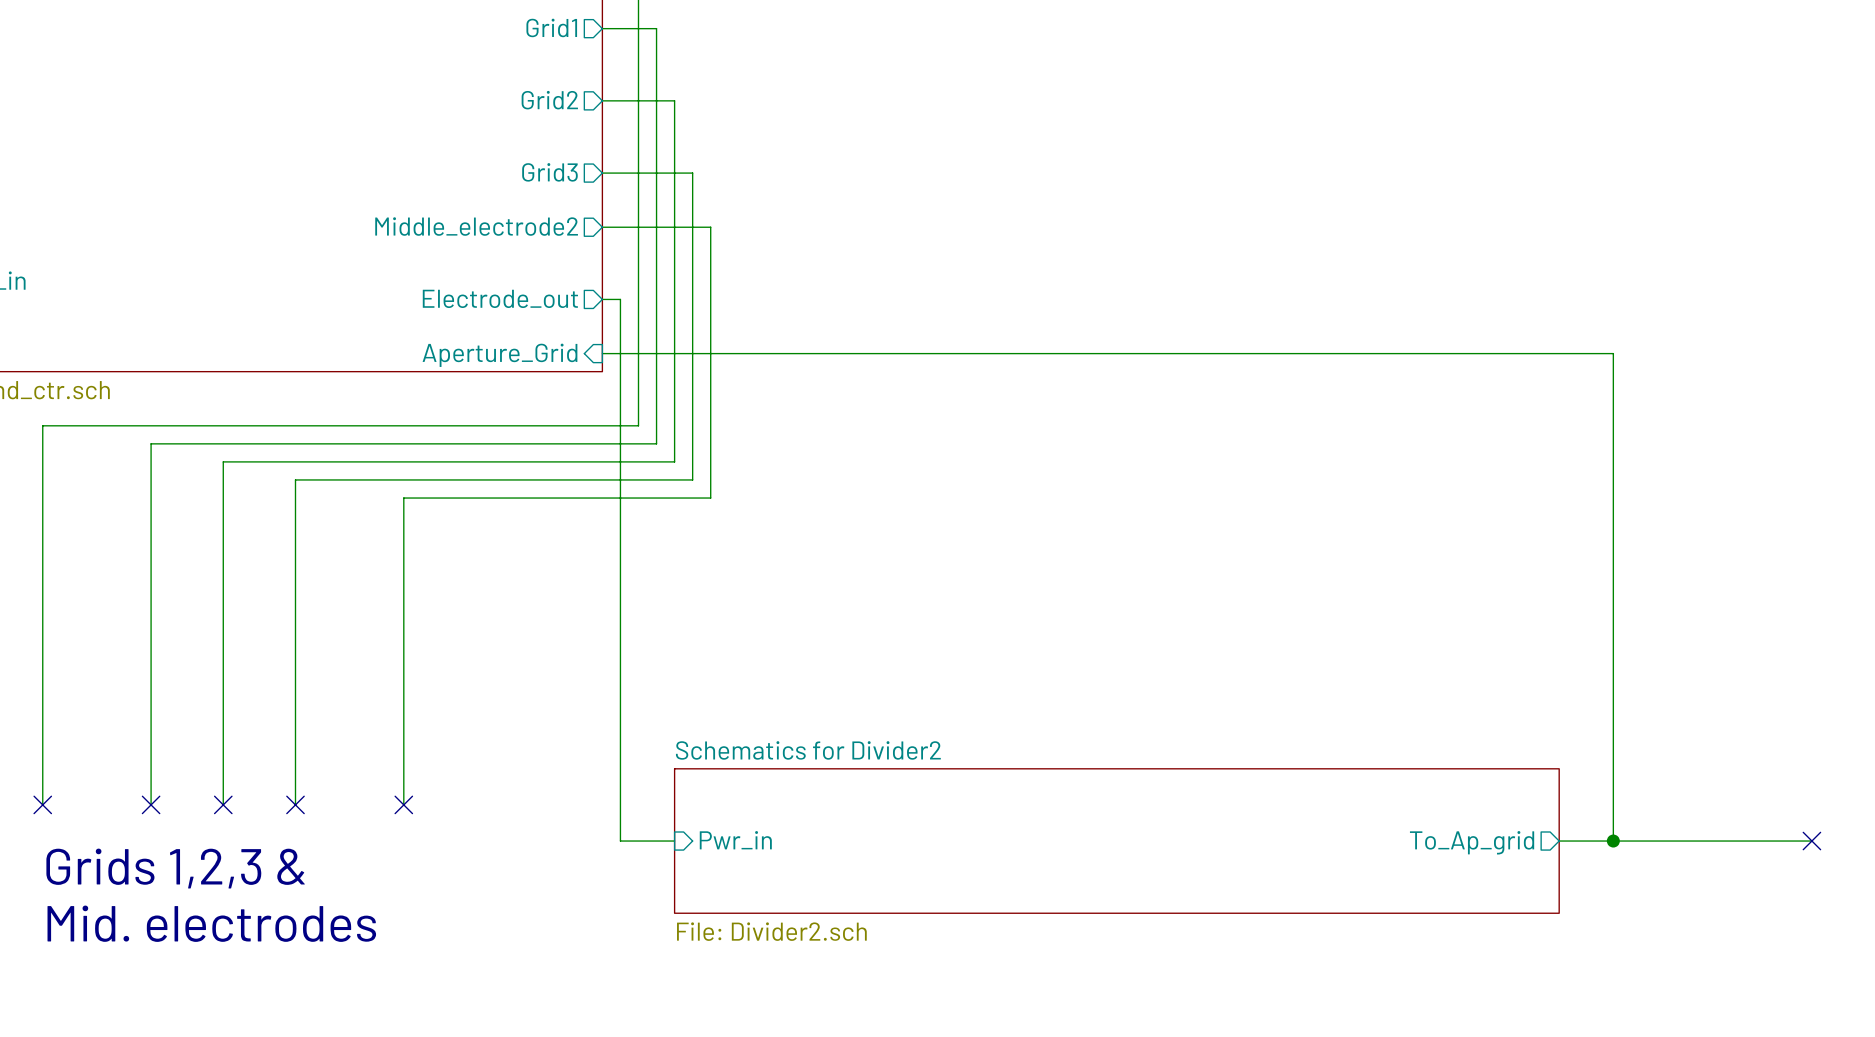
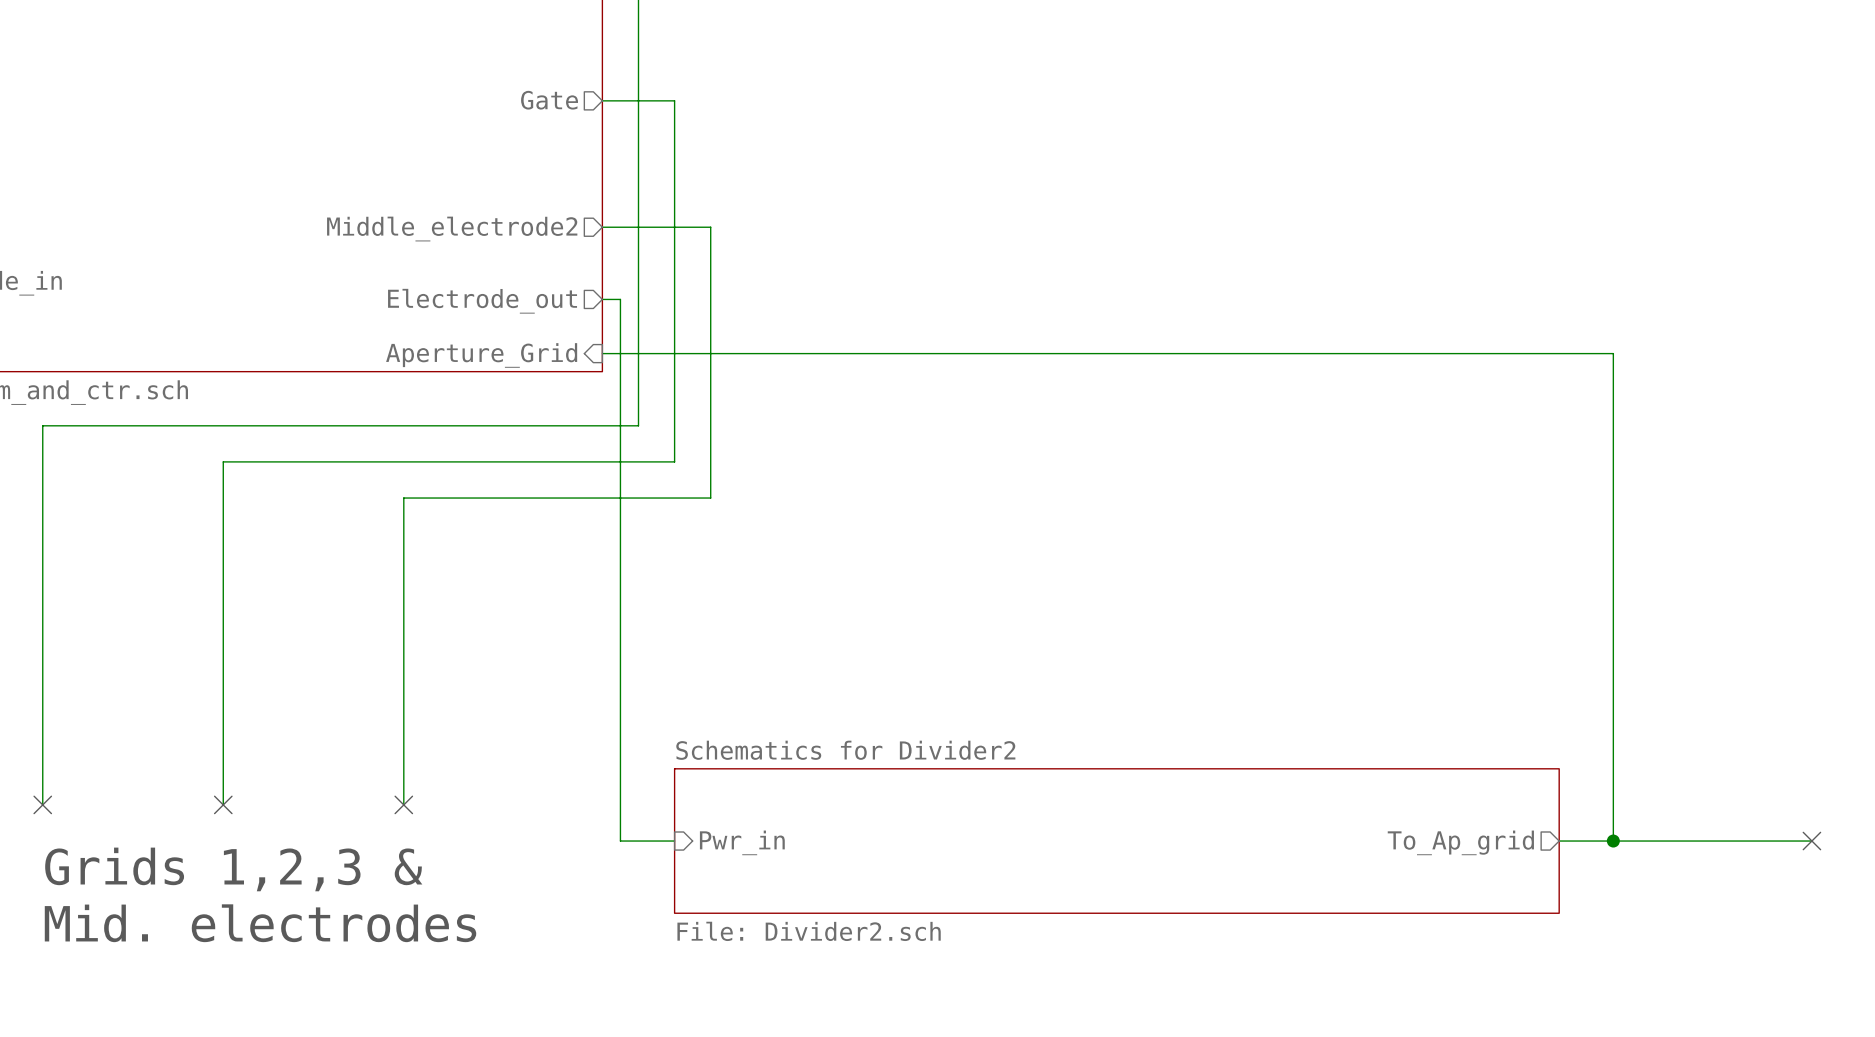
sheet pin: Grid1 (551, 27) -> none
wire: (602, 28) (656, 28) (656, 443) (151, 443) (151, 804) -> none
sheet pin: Grid2 (549, 100) -> Gate (549, 100)
sheet pin: Grid3 (549, 172) -> none
wire: (602, 173) (692, 173) (692, 479) (295, 479) (295, 804) -> none
no-connect mark: (151, 804) -> none
no-connect mark: (295, 804) -> none

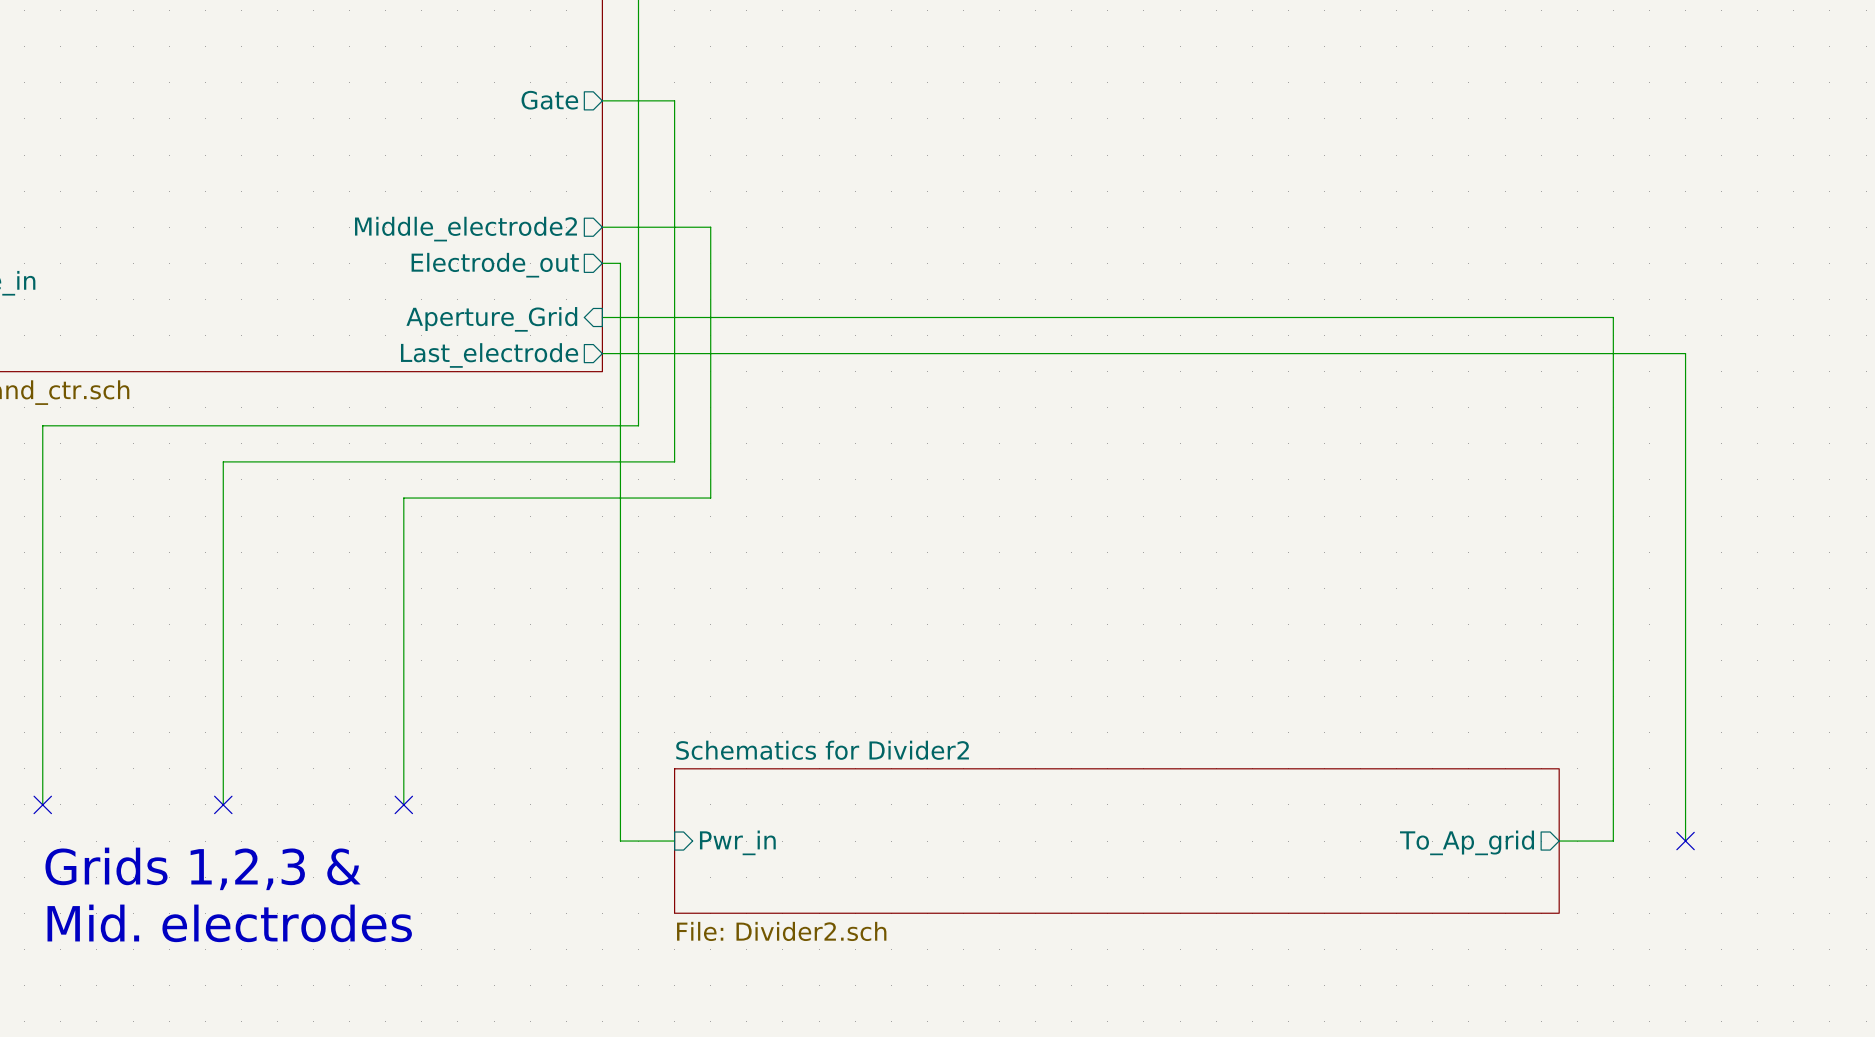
wire: (602, 299) (620, 299) -> (602, 263) (620, 263) (620, 299)
sheet pin position: Electrode_out (482, 301) -> Electrode_out (495, 265)
wire: none -> (602, 317) (1613, 317) (1613, 353) (1685, 353) (1685, 841)
sheet pin: none -> Aperture_Grid (491, 319)
sheet pin shape: input (481, 355) -> output (489, 355)
sheet pin: Aperture_Grid (481, 355) -> Last_electrode (489, 355)
wire: (1613, 841) (1811, 841) -> none
junction: (1613, 841) -> none
no-connect mark: none -> (1685, 841)
no-connect mark: (1811, 841) -> none

